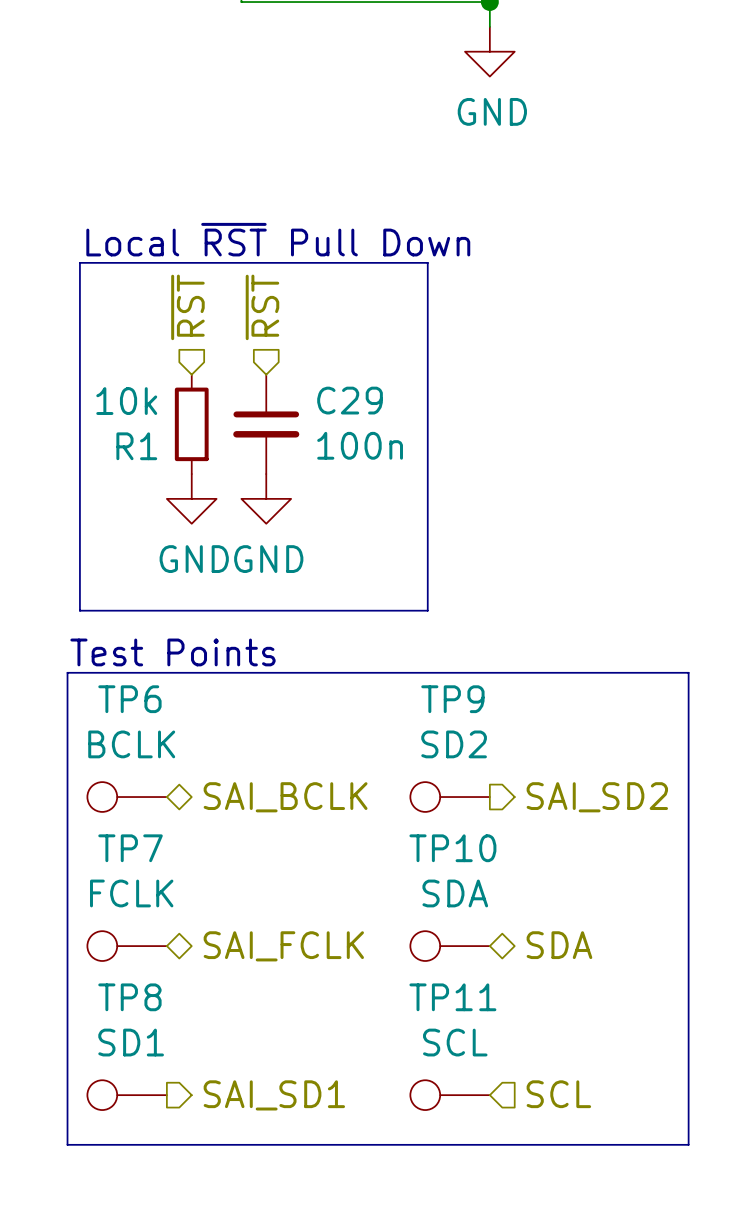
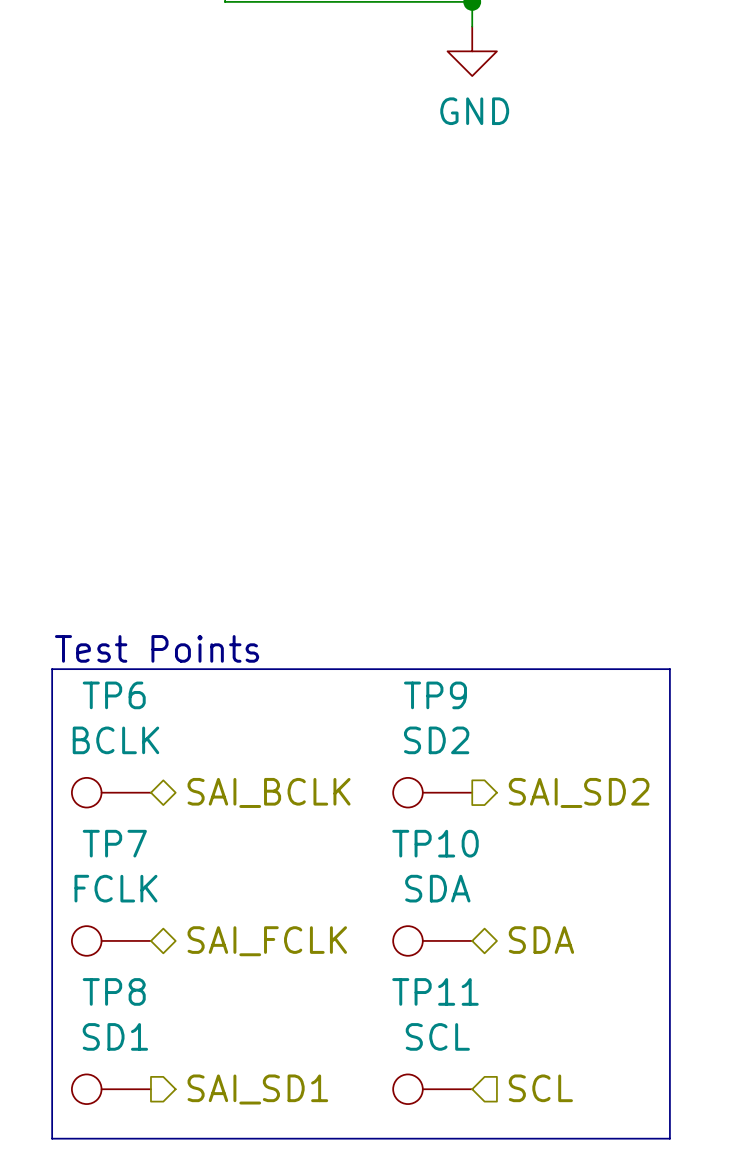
text: Local ~{RST} Pull Down (278, 239) -> none
line: (79, 262) (427, 262) (427, 610) (79, 610) (79, 262) -> none
hierarchical label: ~{RST} (187, 307) -> none
hierarchical label: ~{RST} (262, 307) -> none
R1: 10k (191, 424) -> none
C29: 100n (266, 424) -> none
power symbol: GND (191, 498) -> none
power symbol: GND (266, 498) -> none

